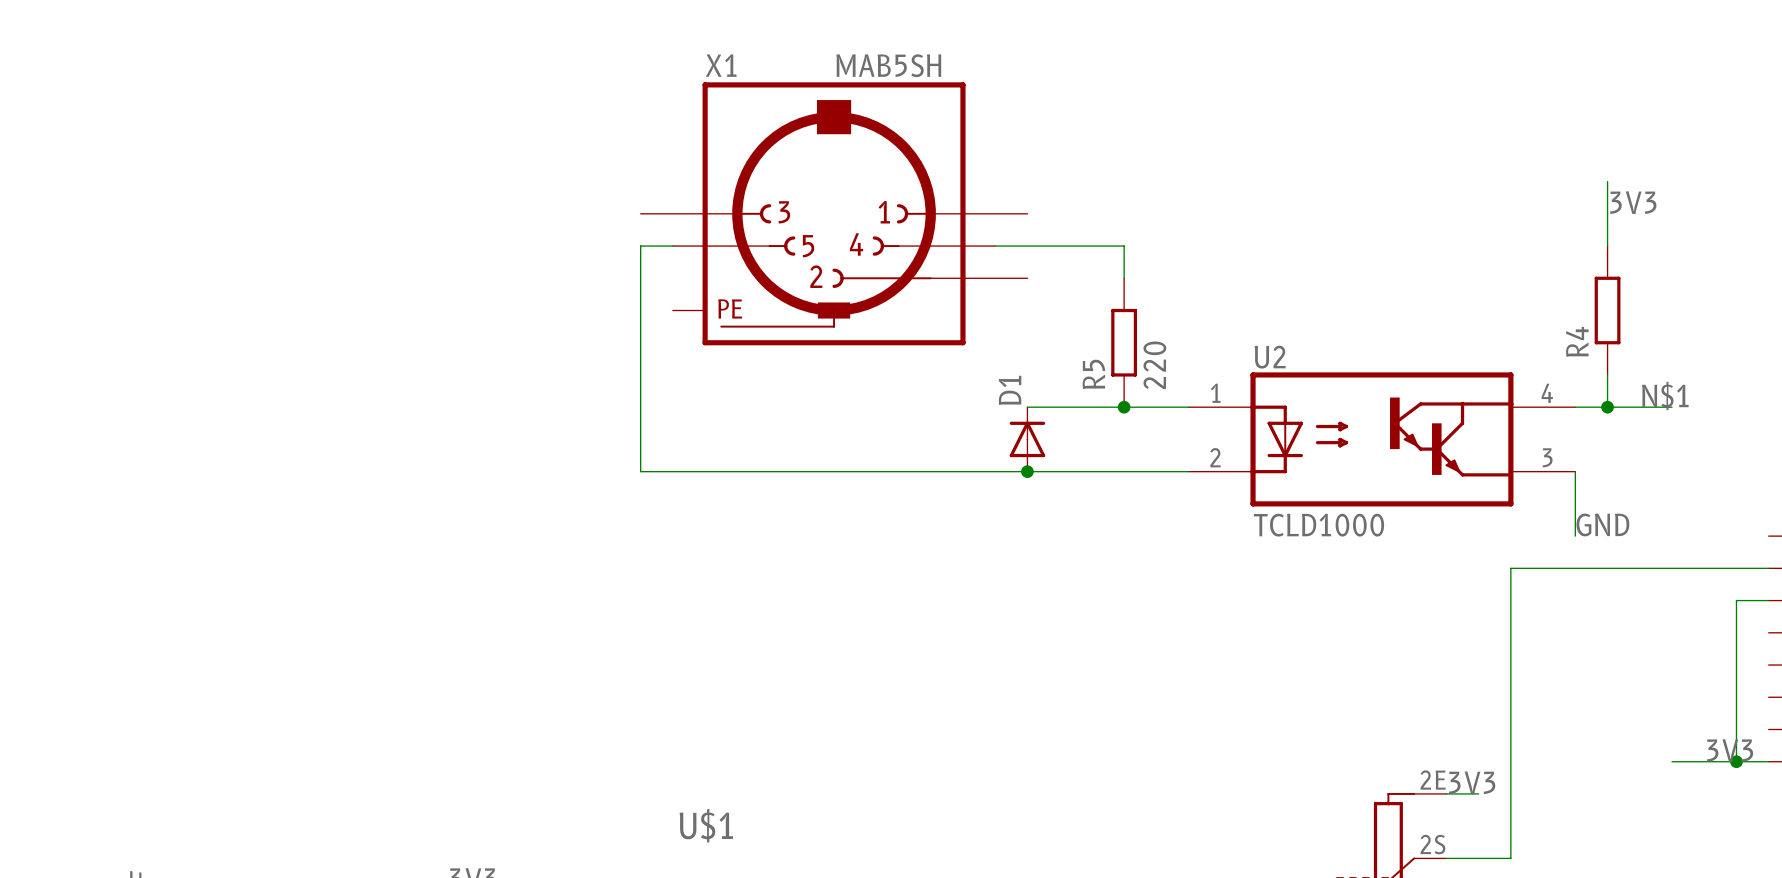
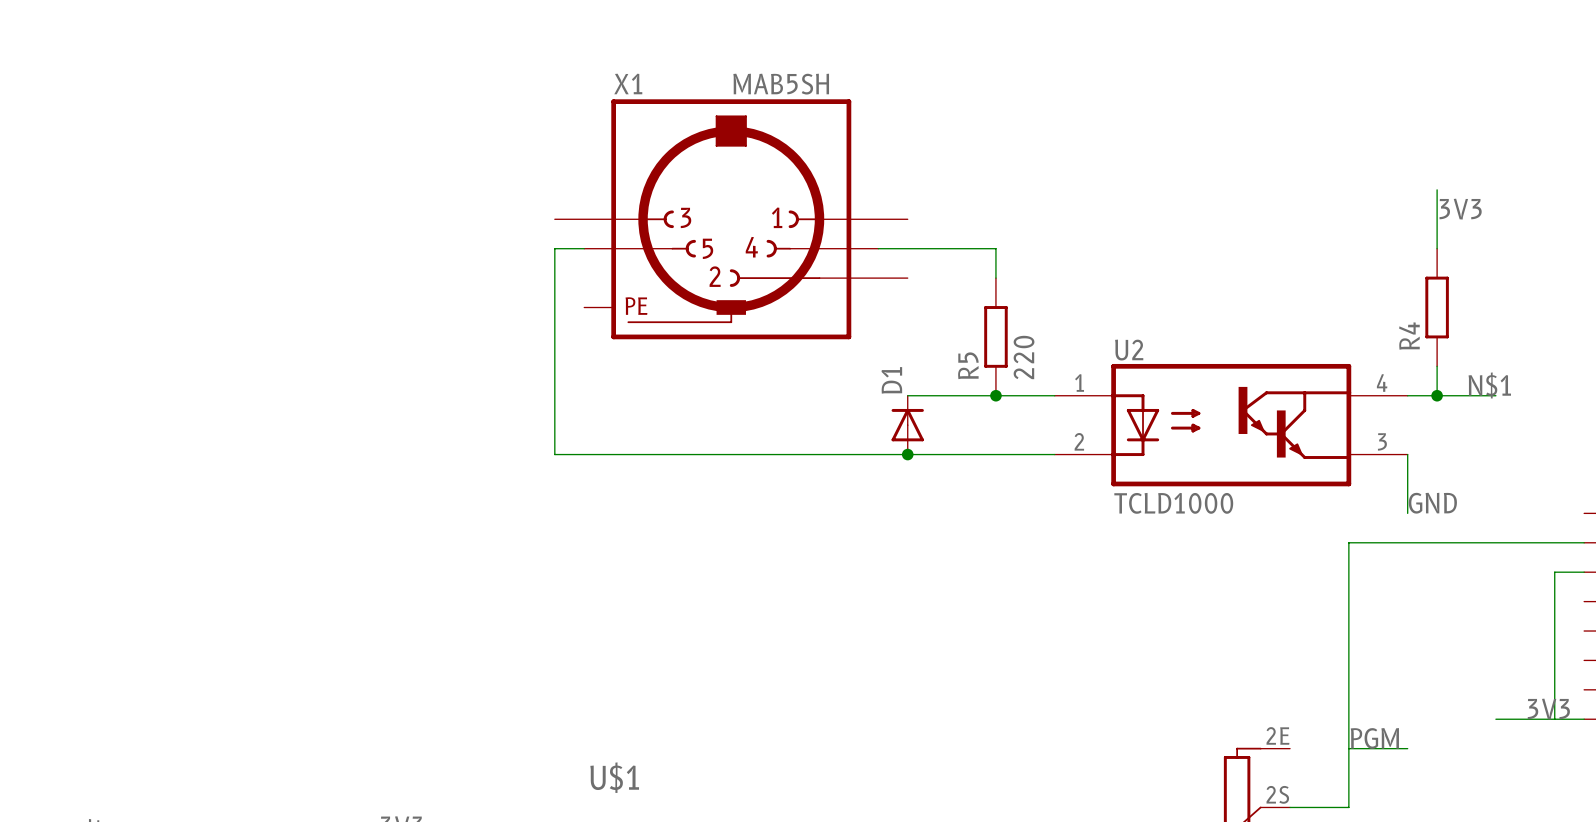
junction: (1736, 761) -> none
label: 3V3 (1472, 782) -> none
label: none -> PGM (1374, 738)
wire: (1446, 793) (1478, 793) -> none
wire: none -> (1348, 748) (1407, 748)

